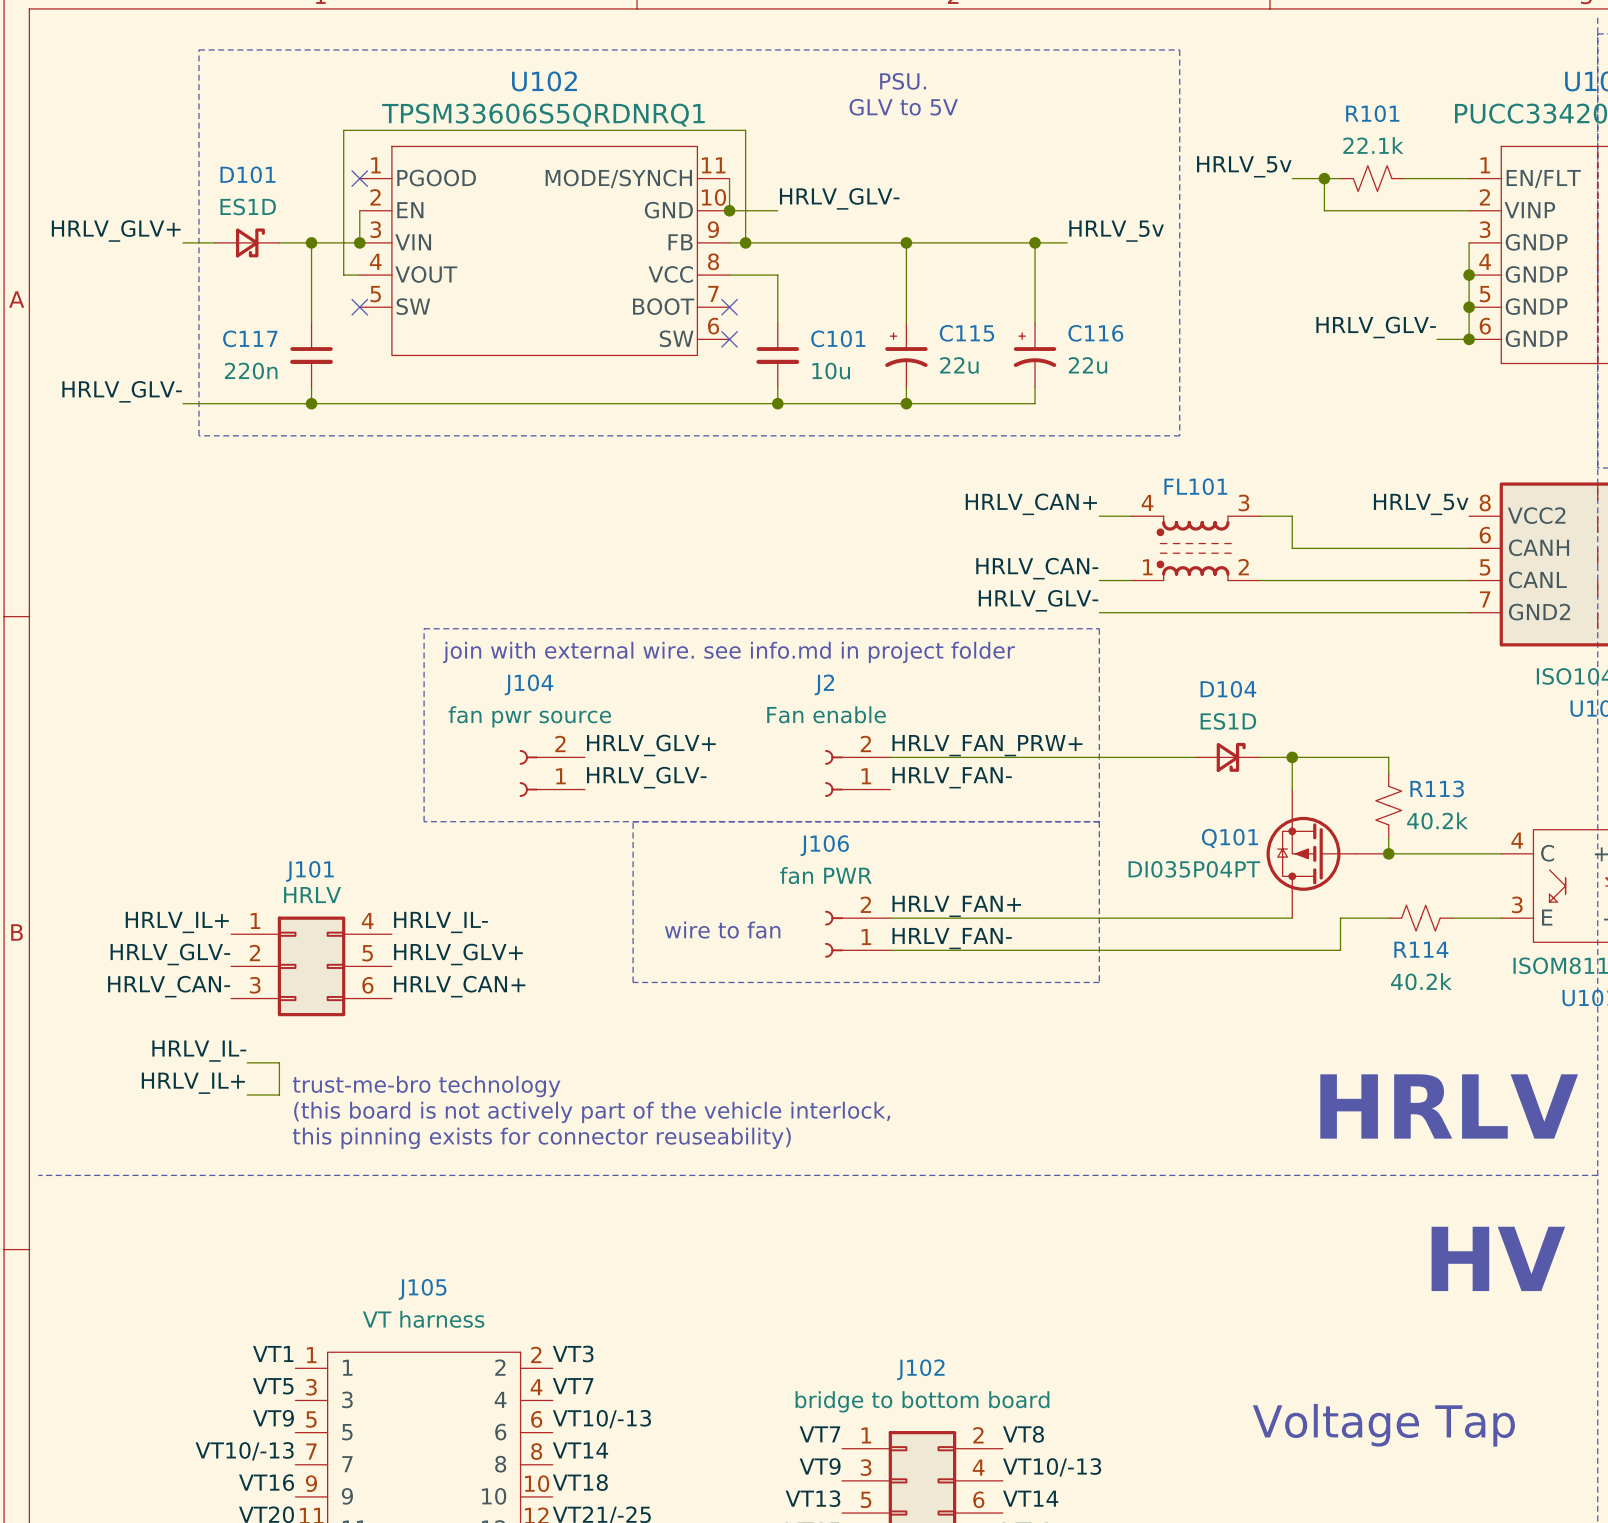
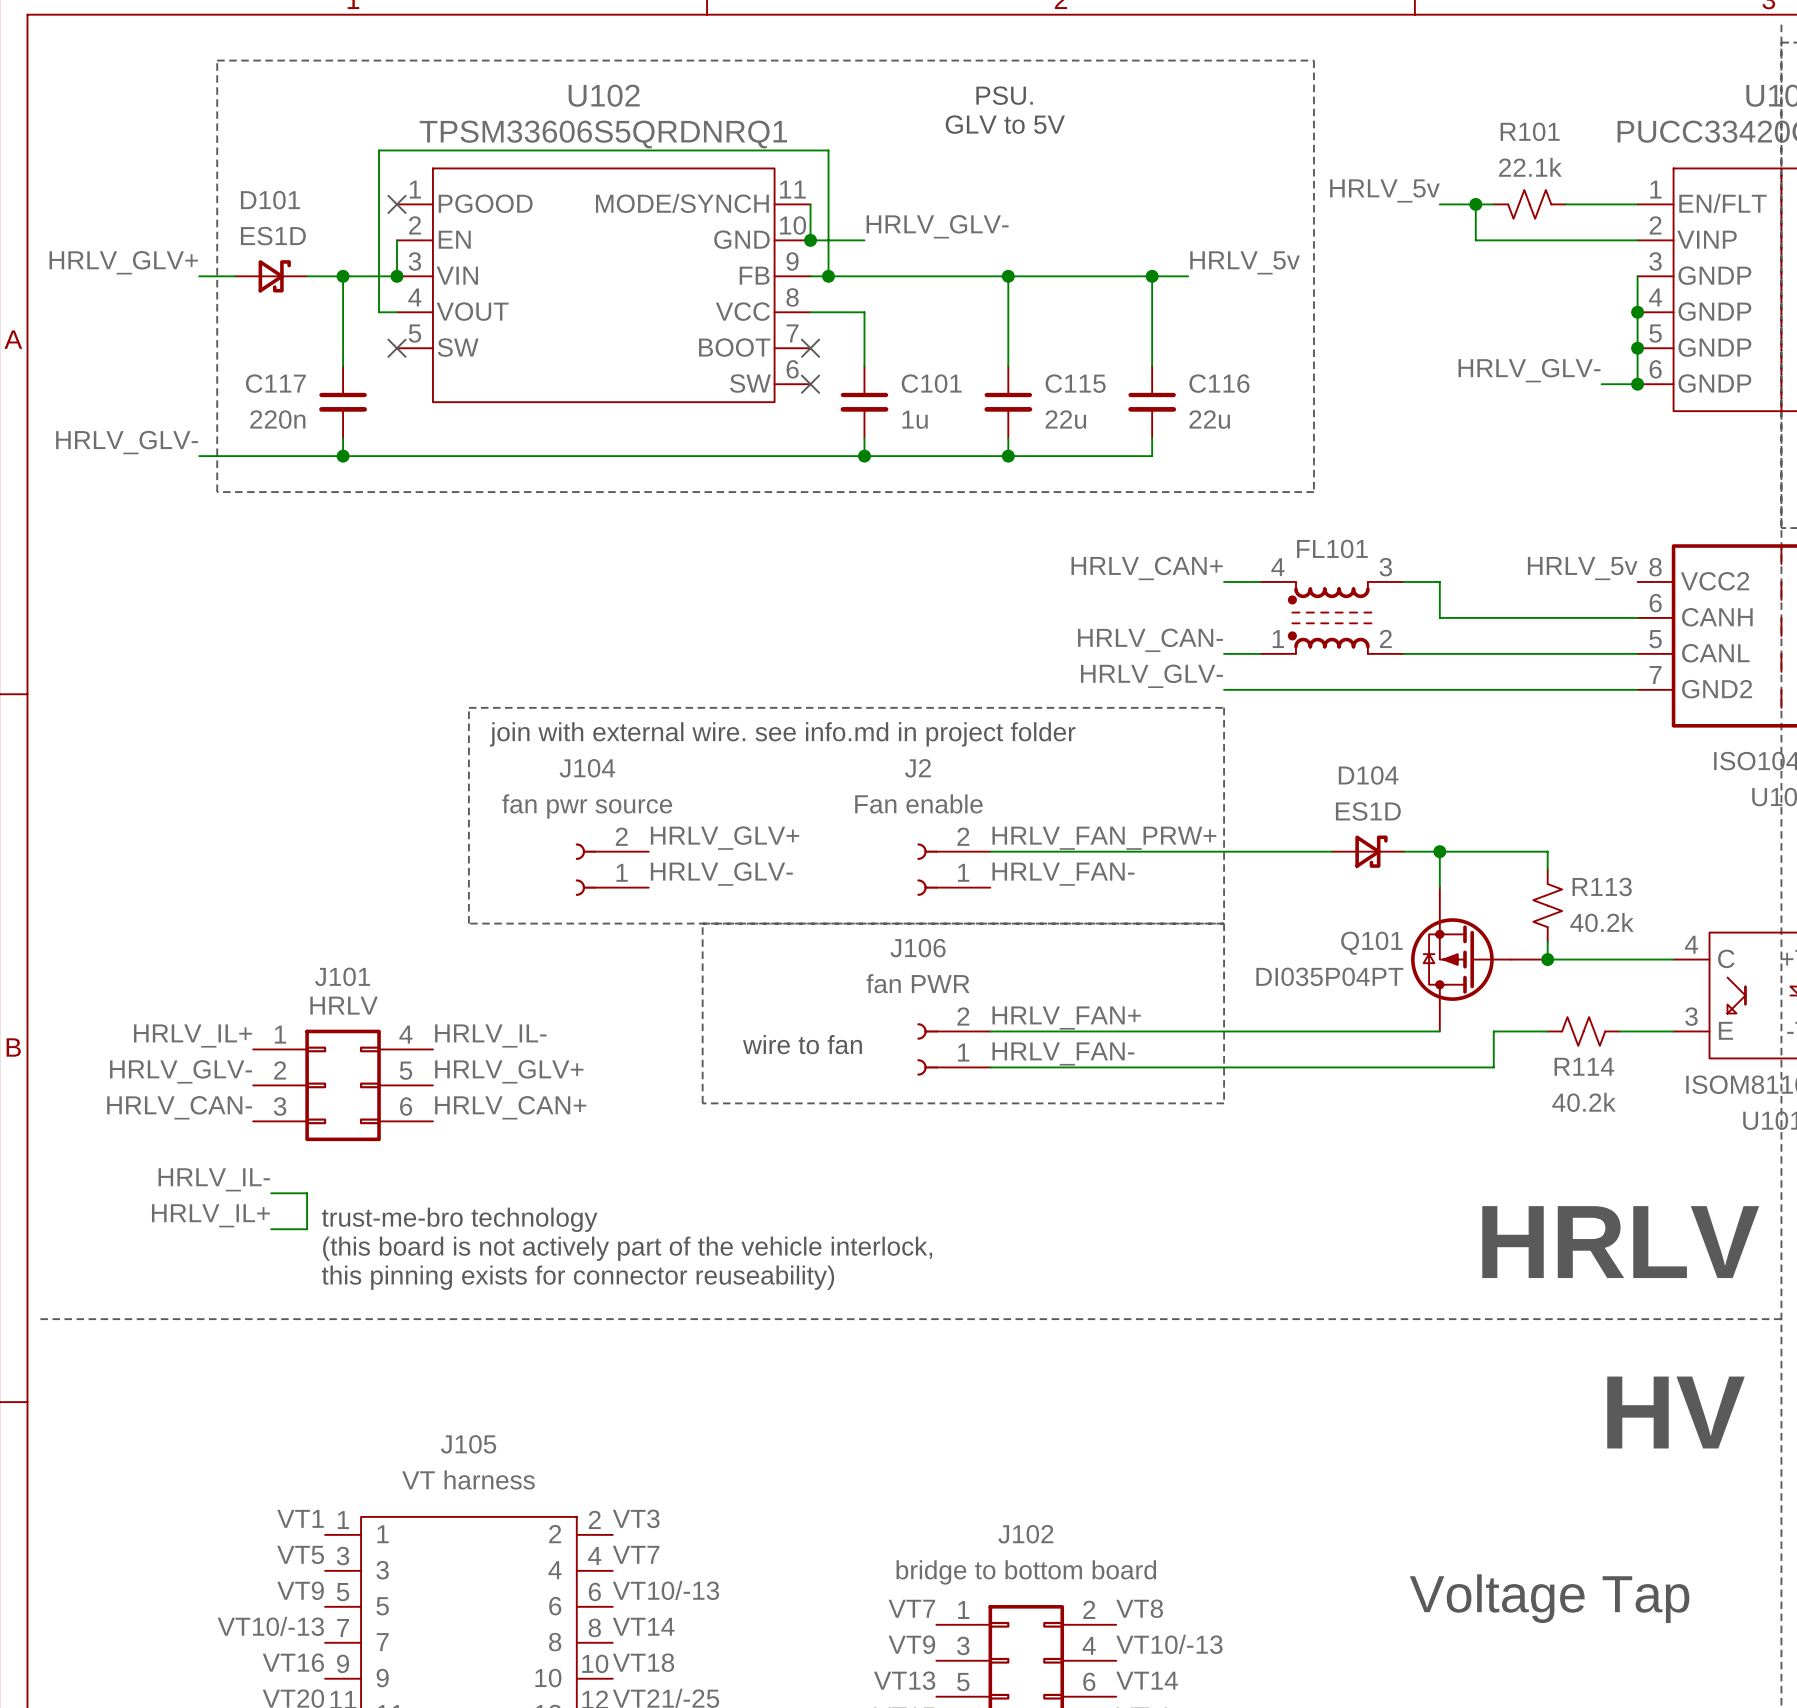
C115 symbol: [885, 323, 928, 388] -> [984, 366, 1033, 439]
C116 symbol: [1013, 323, 1057, 388] -> [1128, 366, 1177, 439]
C101 value: 10u (831, 371) -> 1u (915, 419)

